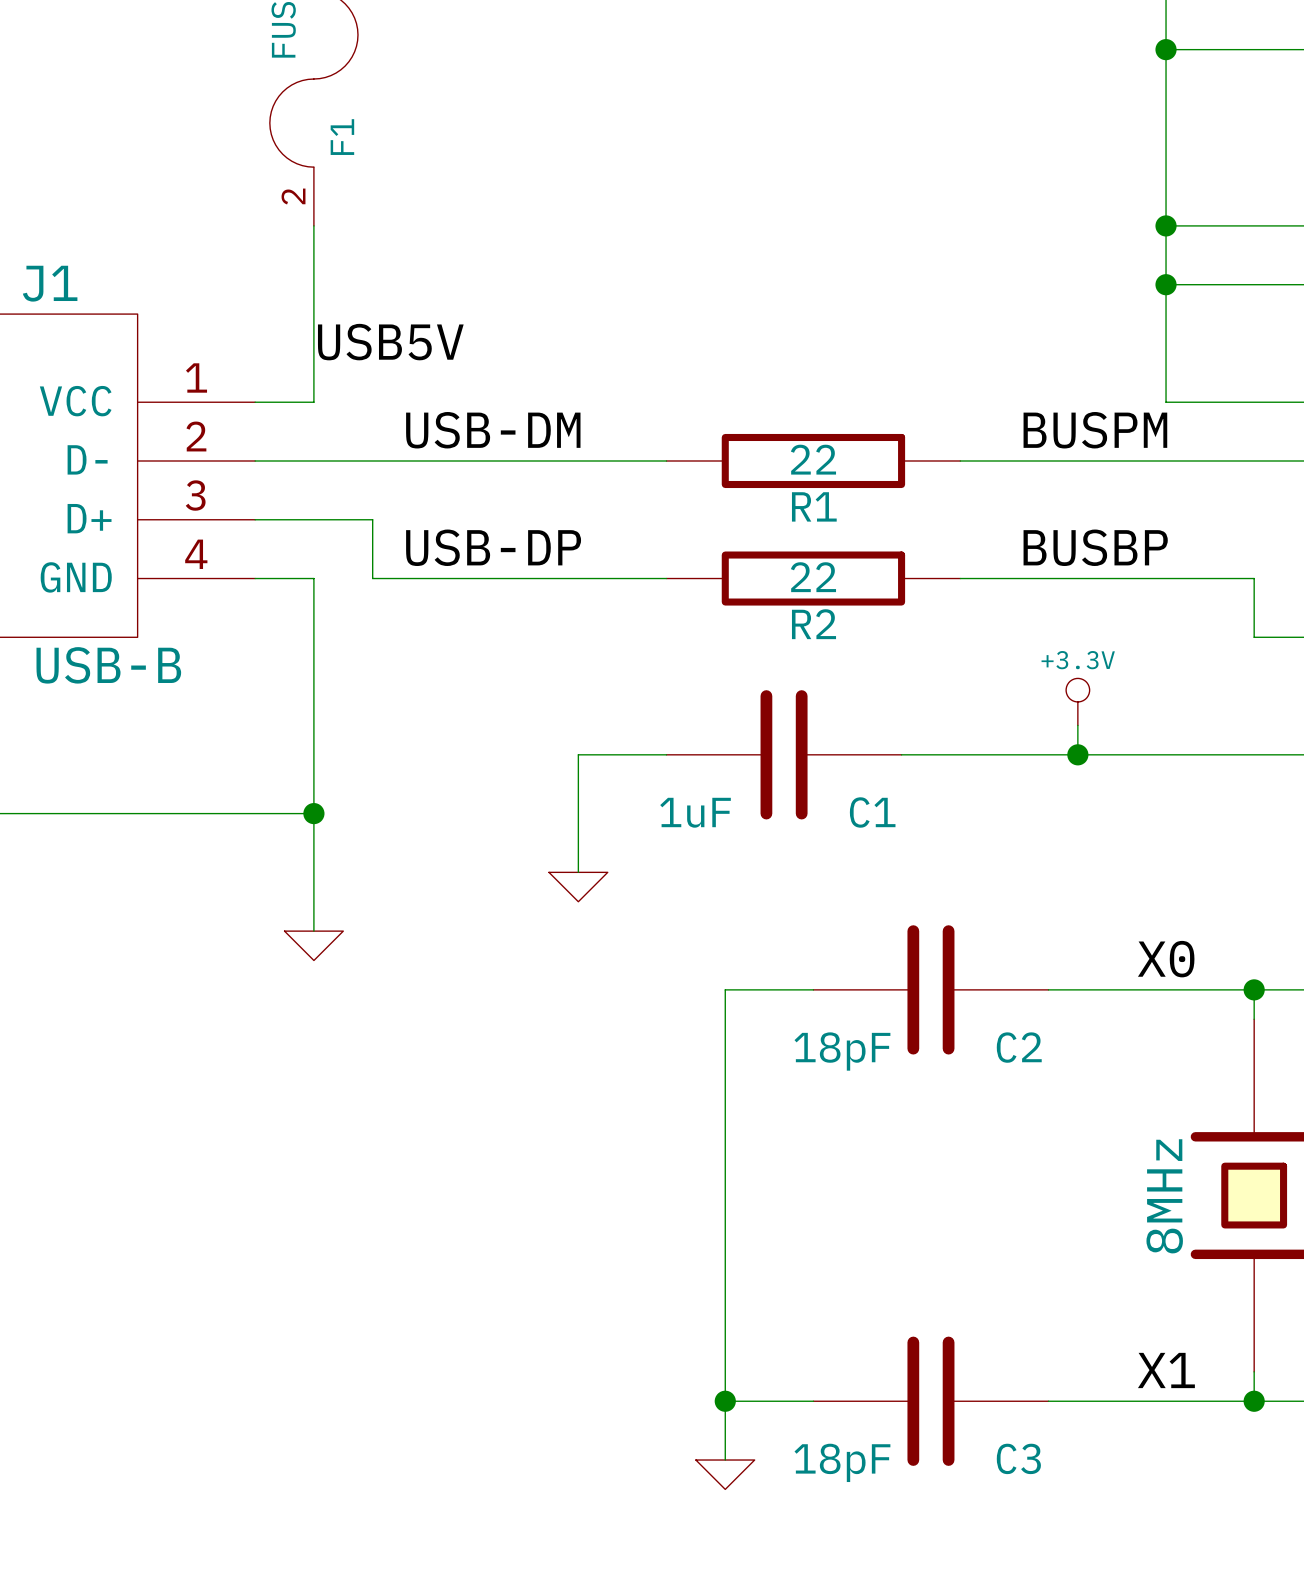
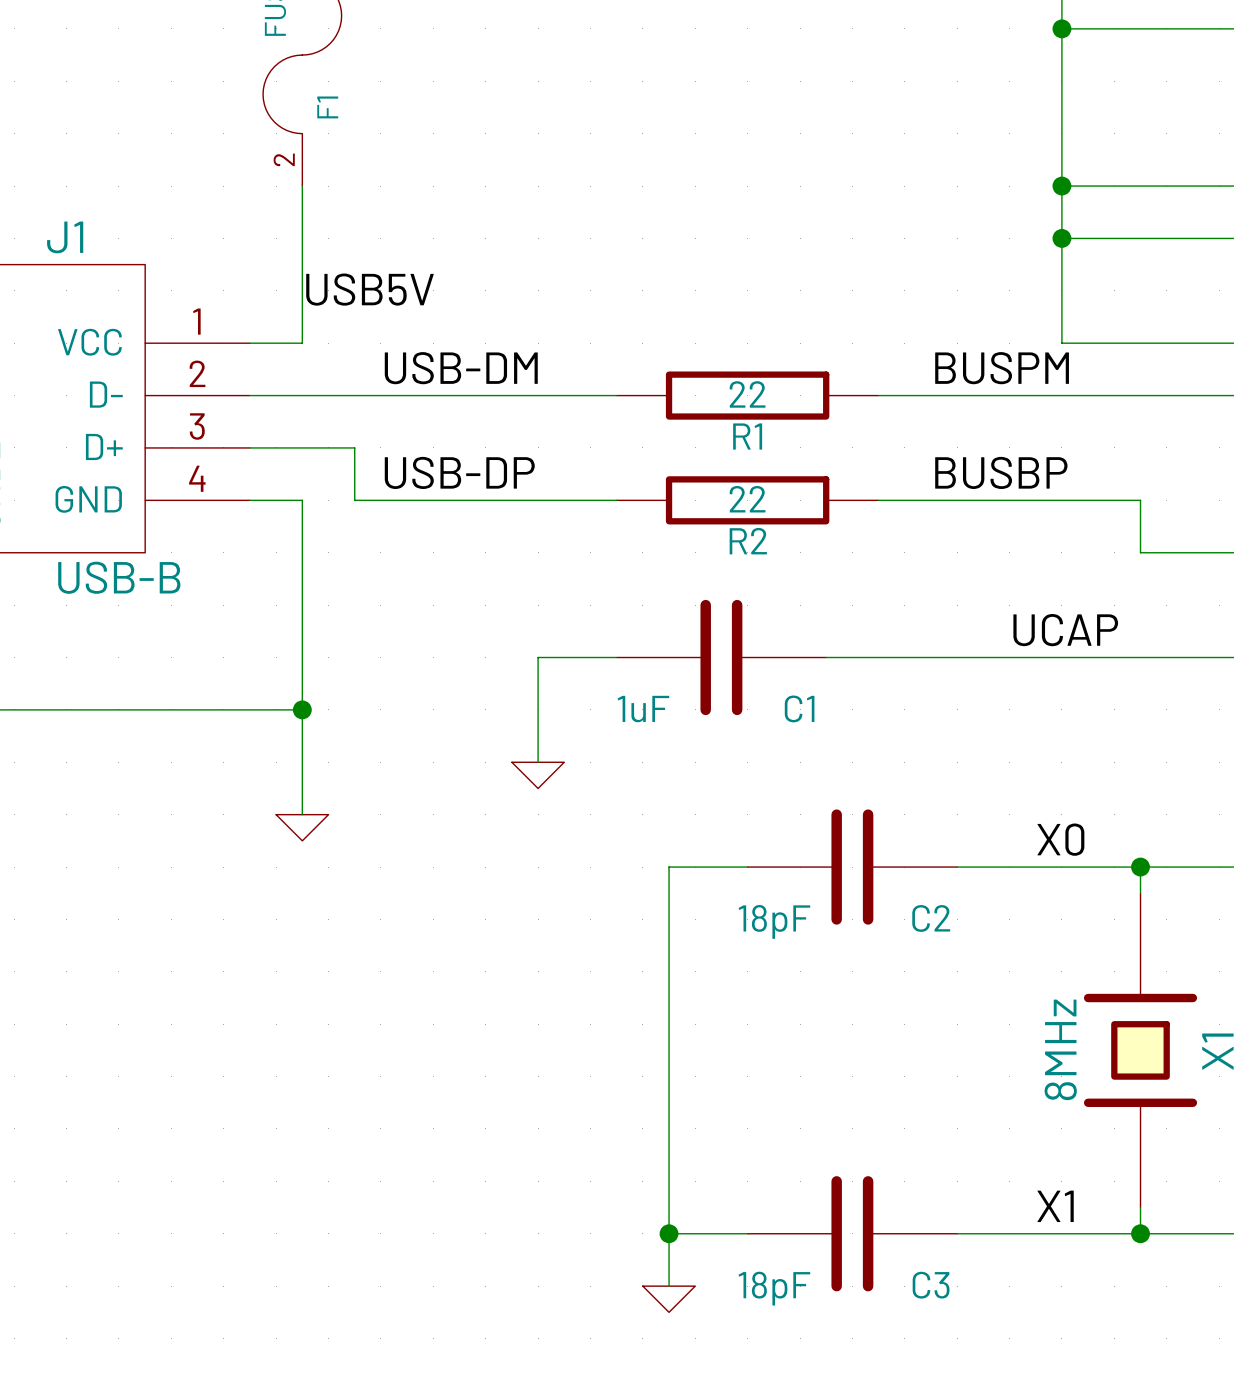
power symbol: +3.3V (1077, 701) -> none
label: none -> UCAP (1065, 630)
wire: (1077, 725) (1077, 754) -> none
junction: (1077, 754) -> none

